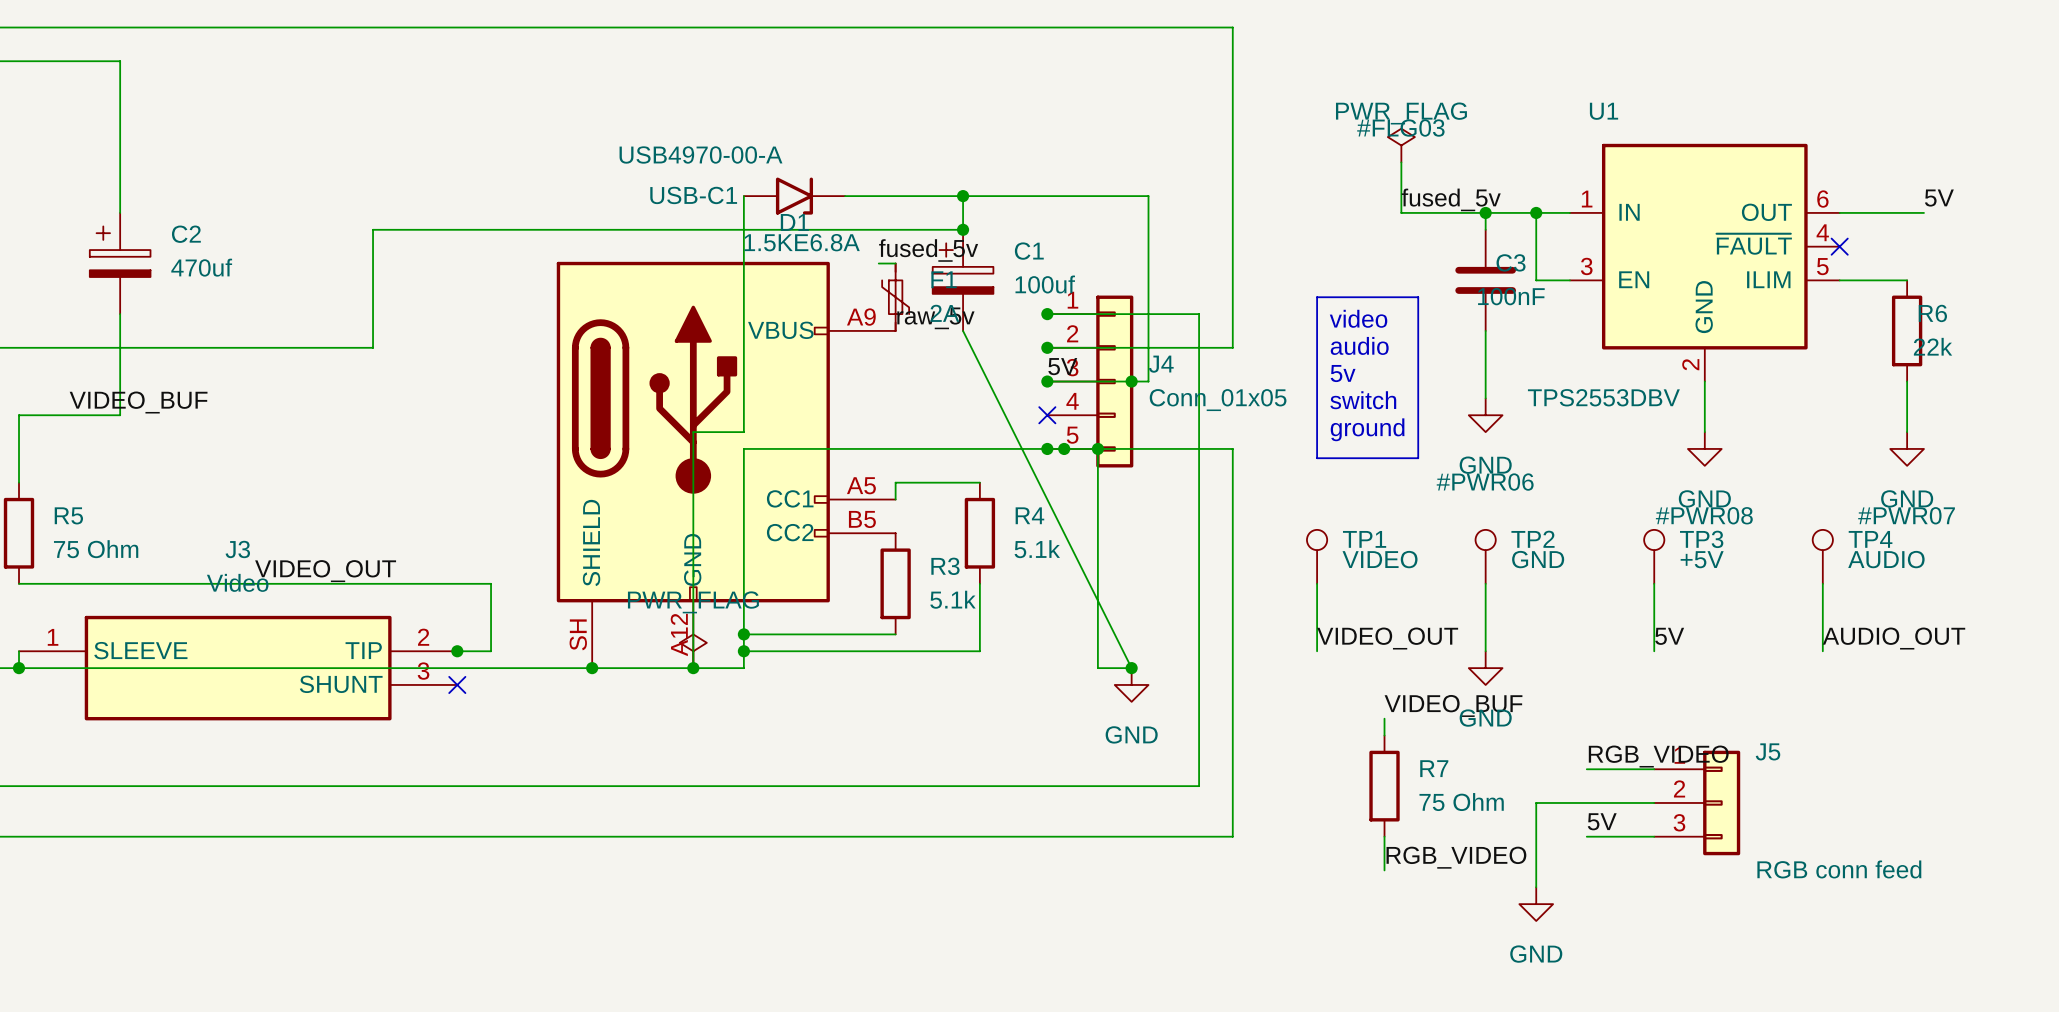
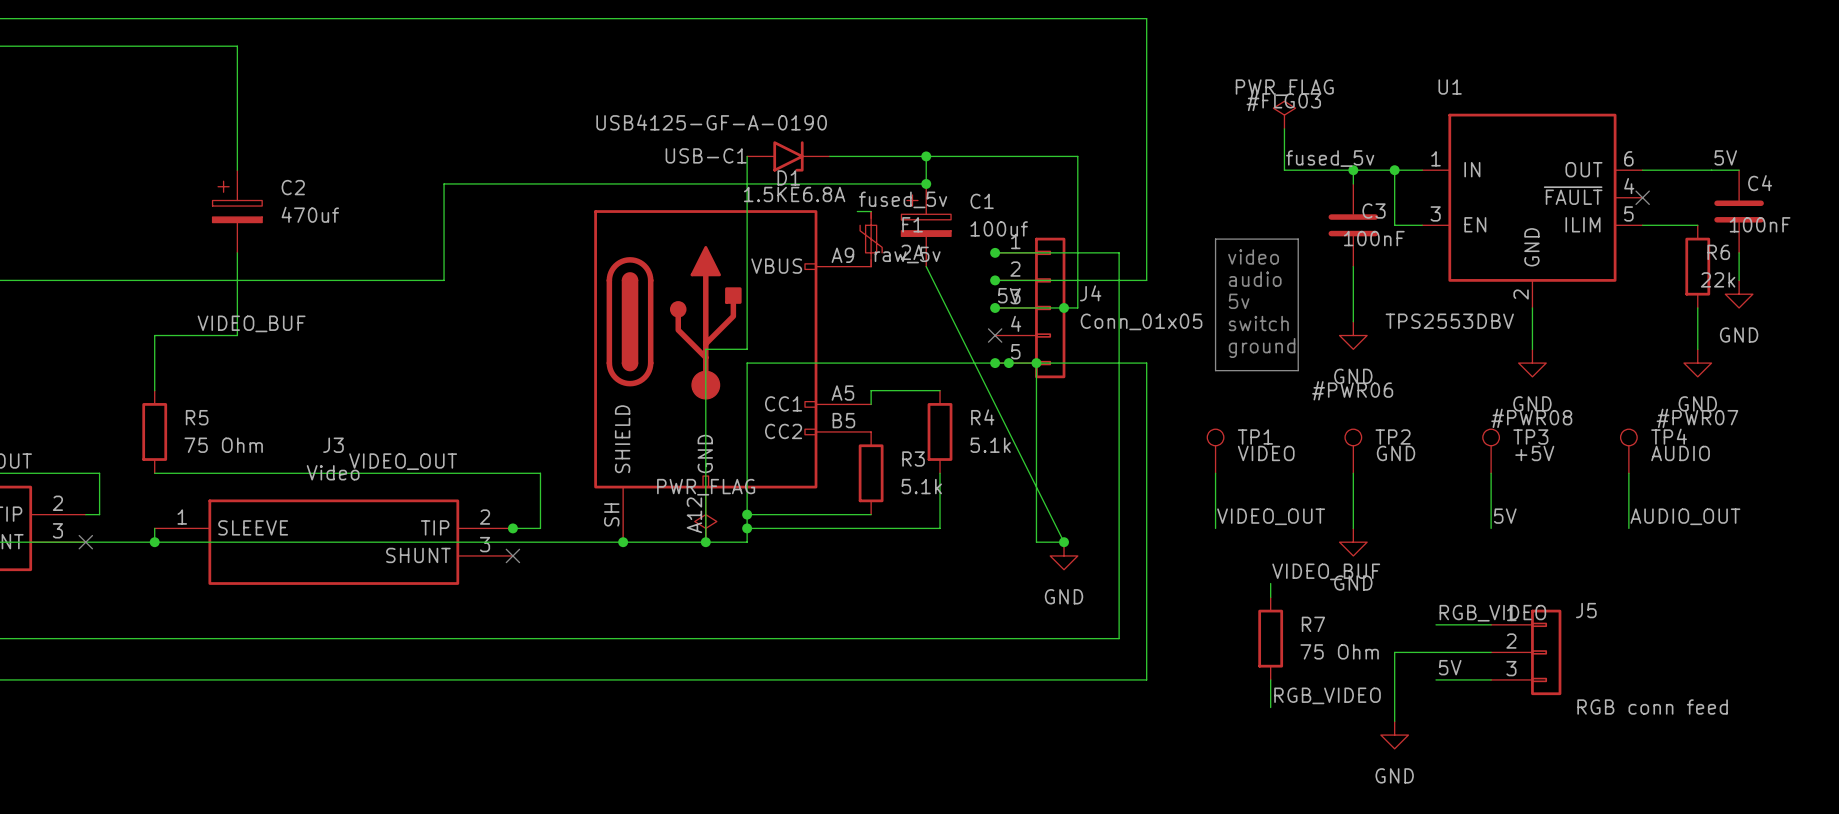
USB-C1 value: USB4970-00-A (700, 155) -> USB4125-GF-A-0190 (711, 122)
wire: none -> (1711, 170) (1739, 170)
C4: none -> 100nF (1739, 211)
wire: none -> (1739, 252) (1739, 280)
power symbol: none -> GND (1739, 294)

